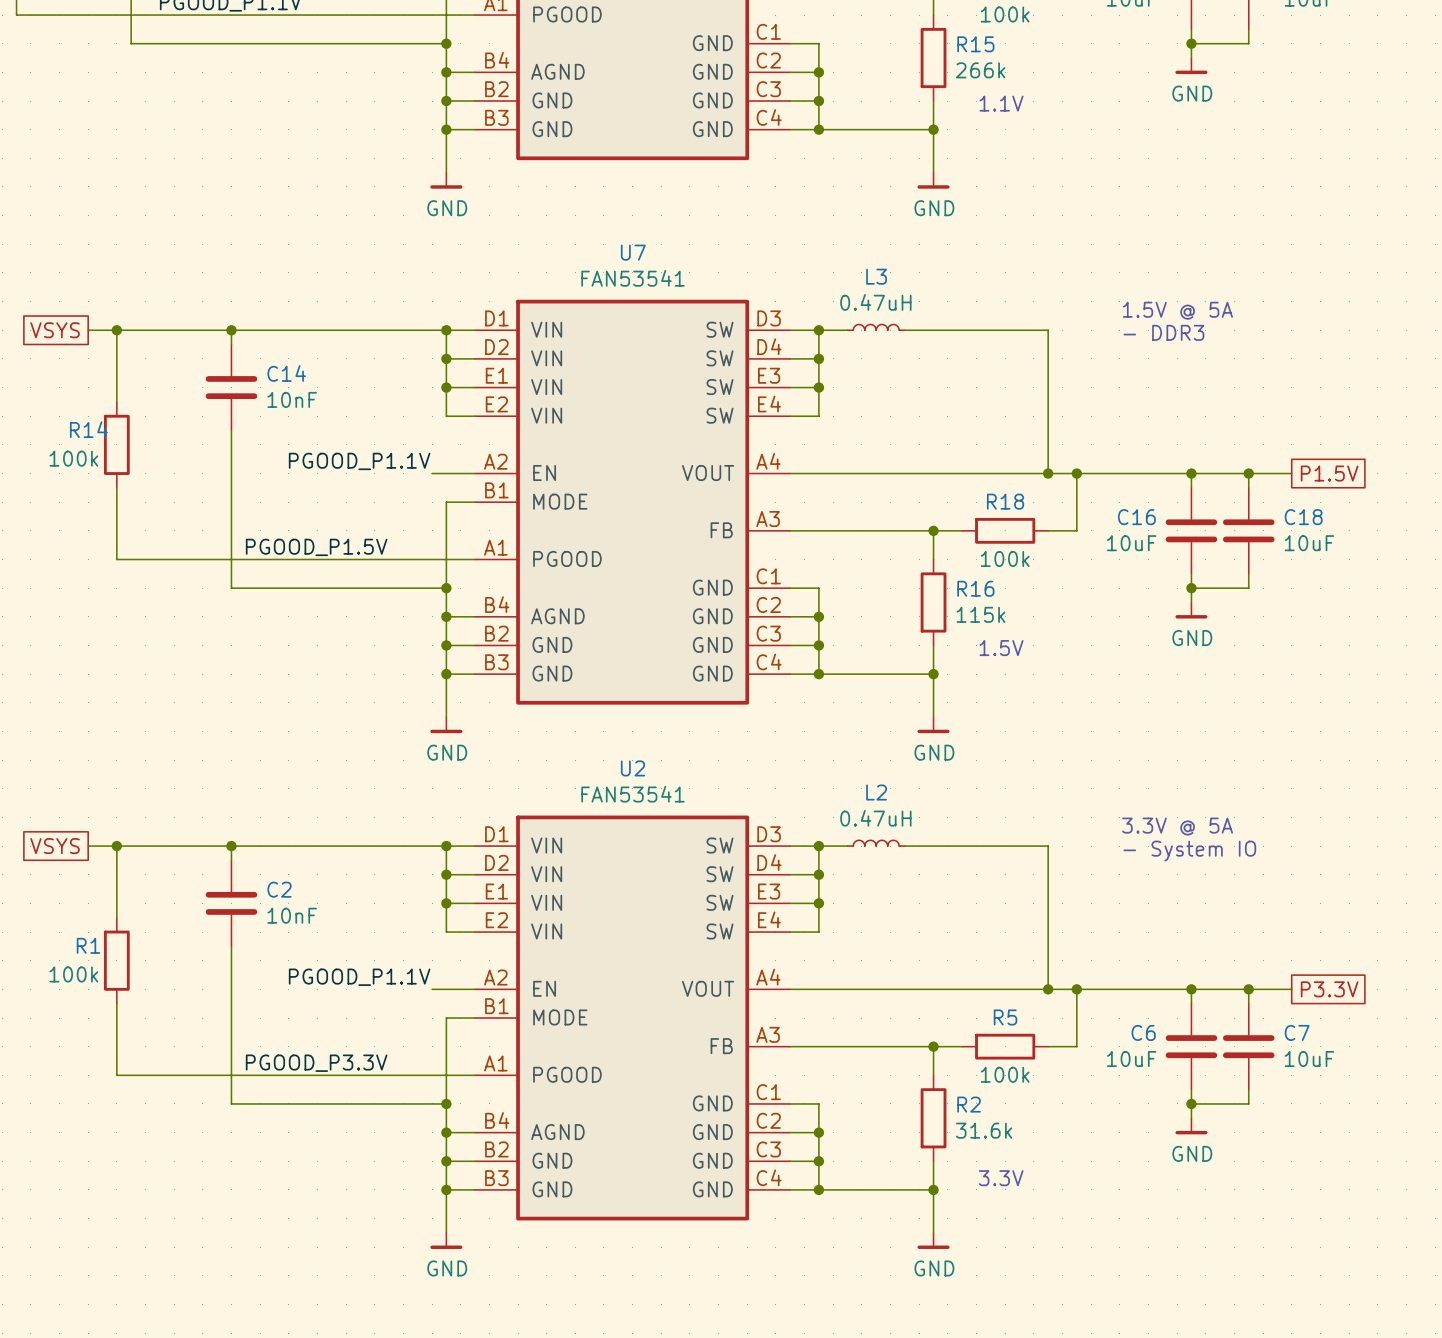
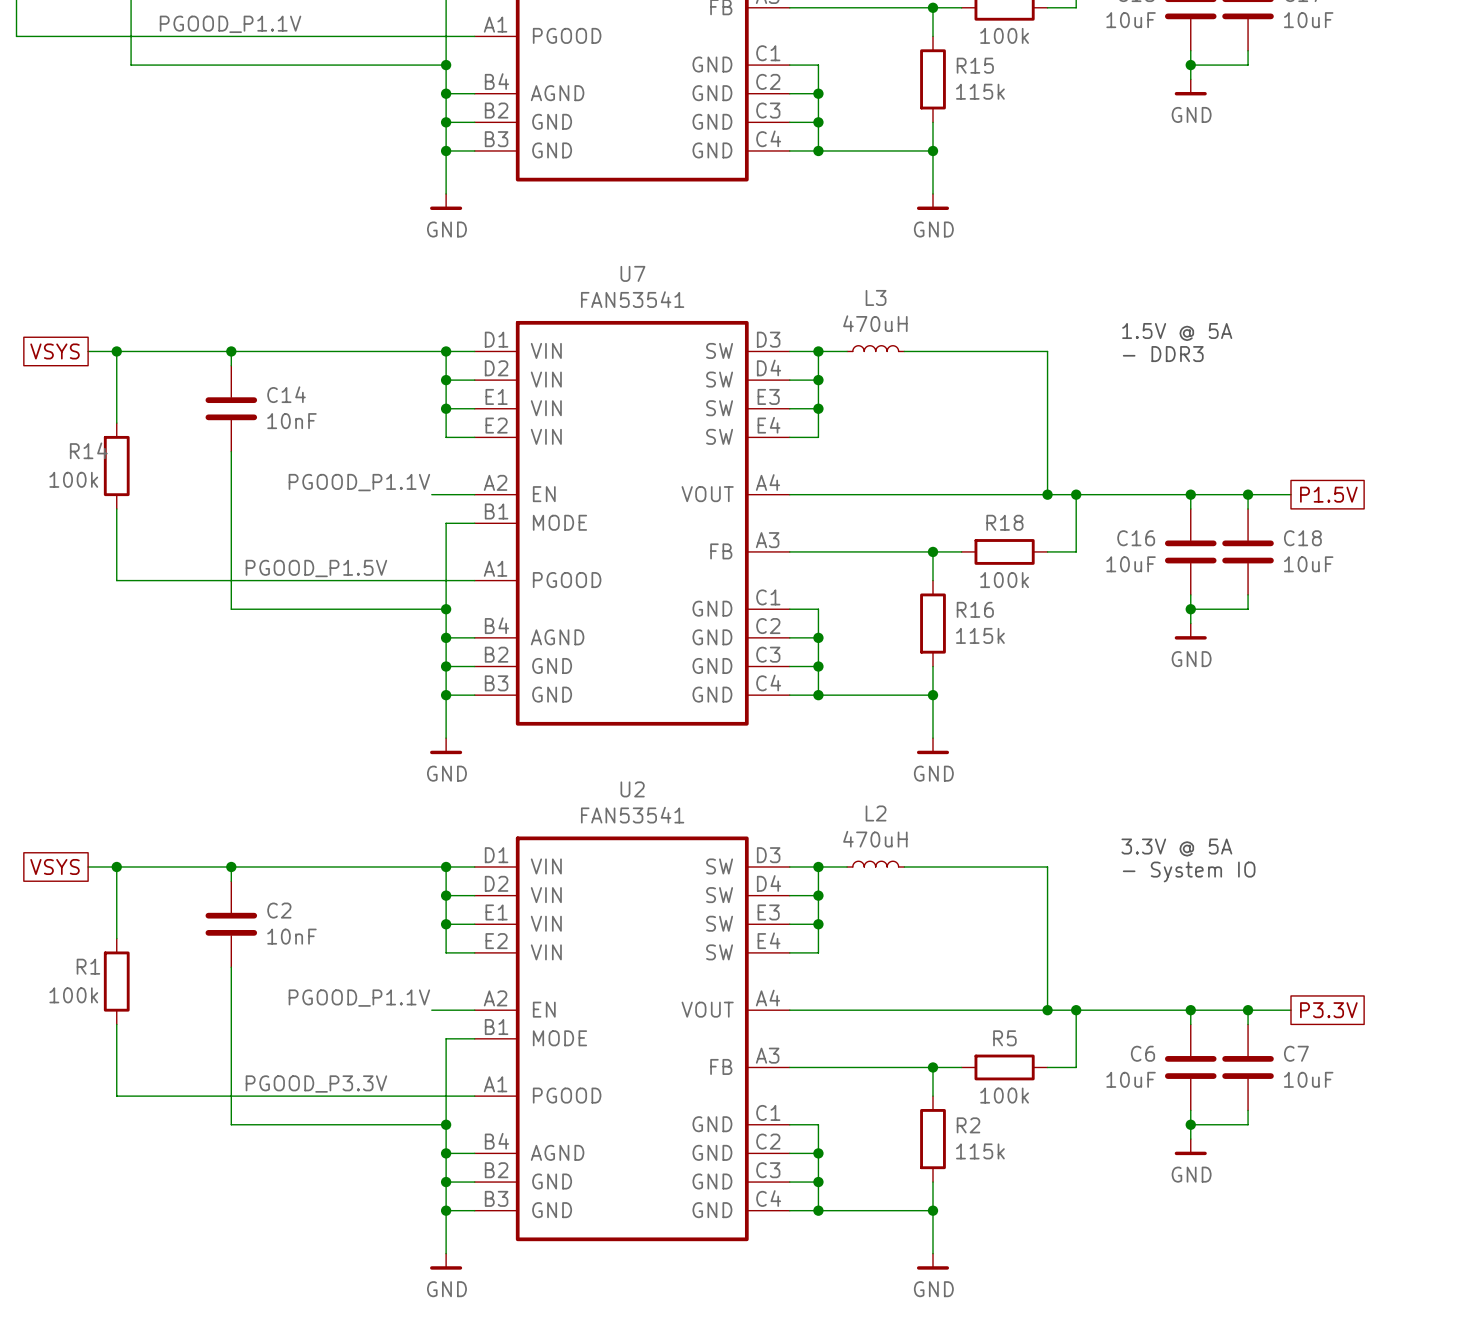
R15 value: 266k (980, 70) -> 115k (980, 91)
text: 1.1V (1001, 103) -> none
L3 value: 0.47uH (875, 302) -> 470uH (875, 323)
text: 1.5V (1001, 648) -> none
L2 value: 0.47uH (875, 818) -> 470uH (875, 839)
R2 value: 31.6k (984, 1130) -> 115k (980, 1151)
text: 3.3V (1001, 1178) -> none

